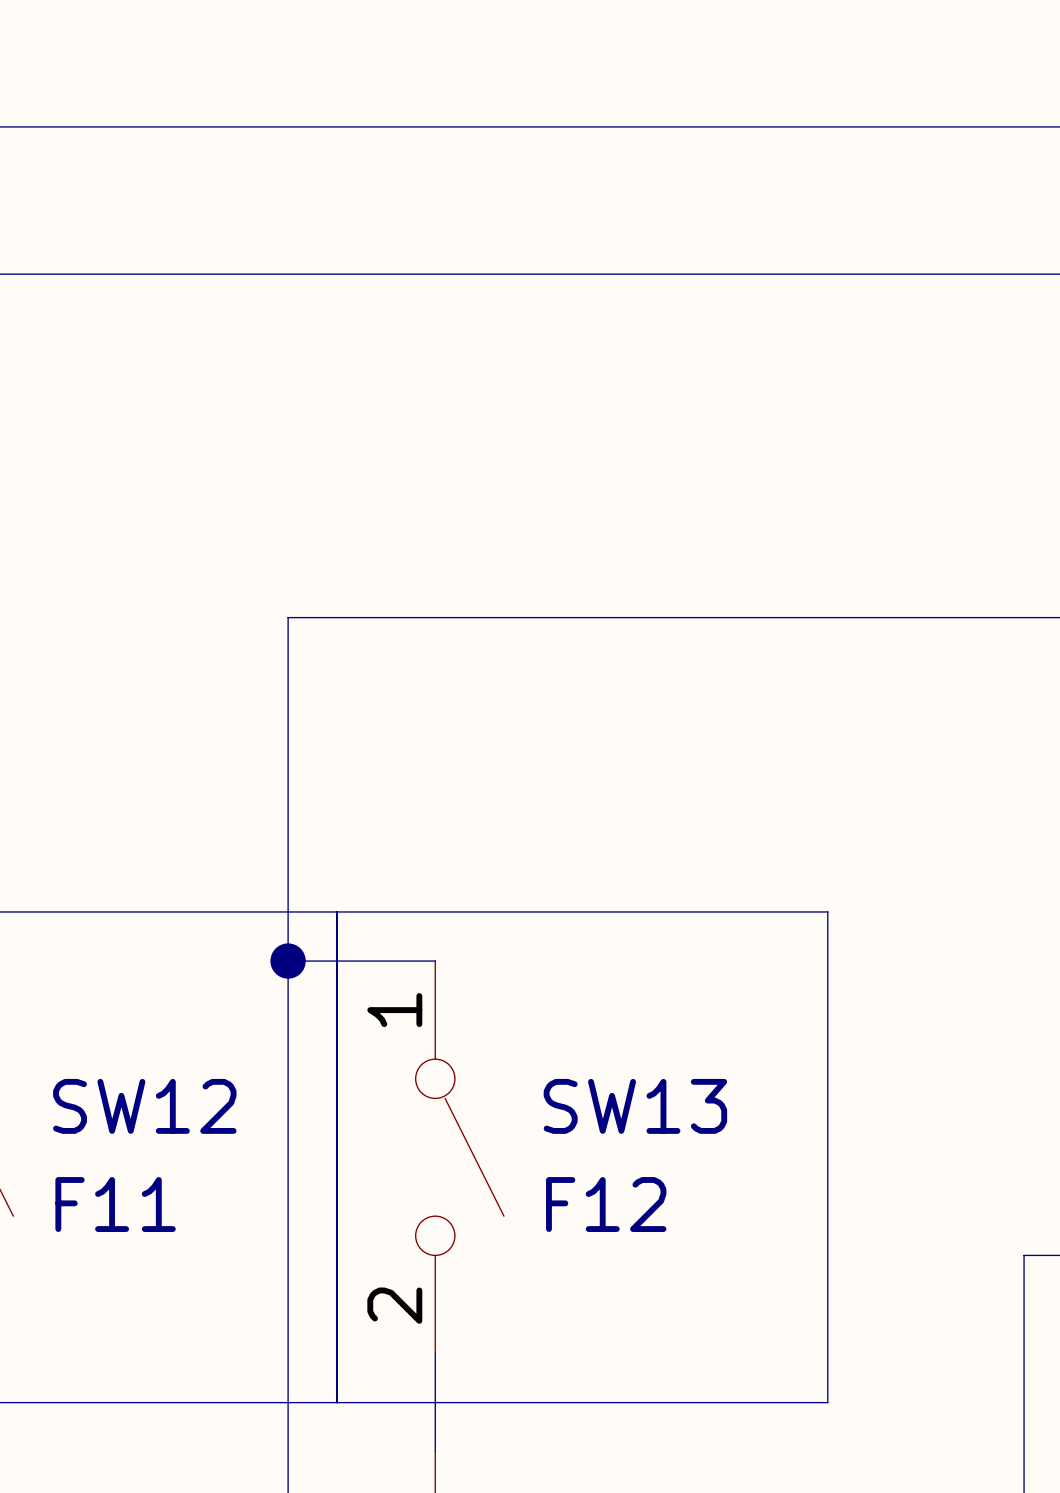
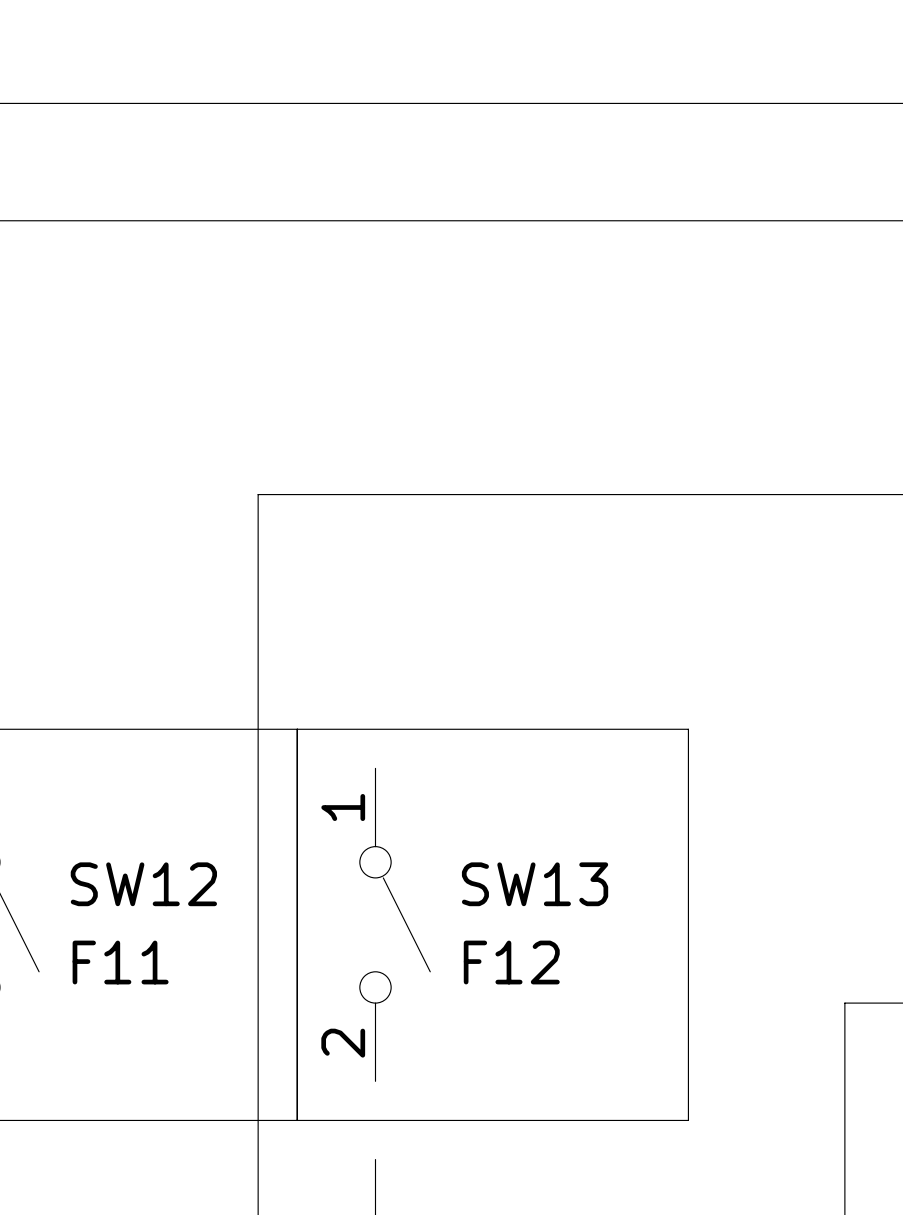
wire: (288, 961) (435, 961) -> none
junction: (288, 961) -> none
wire: (435, 1353) (435, 1451) -> none

